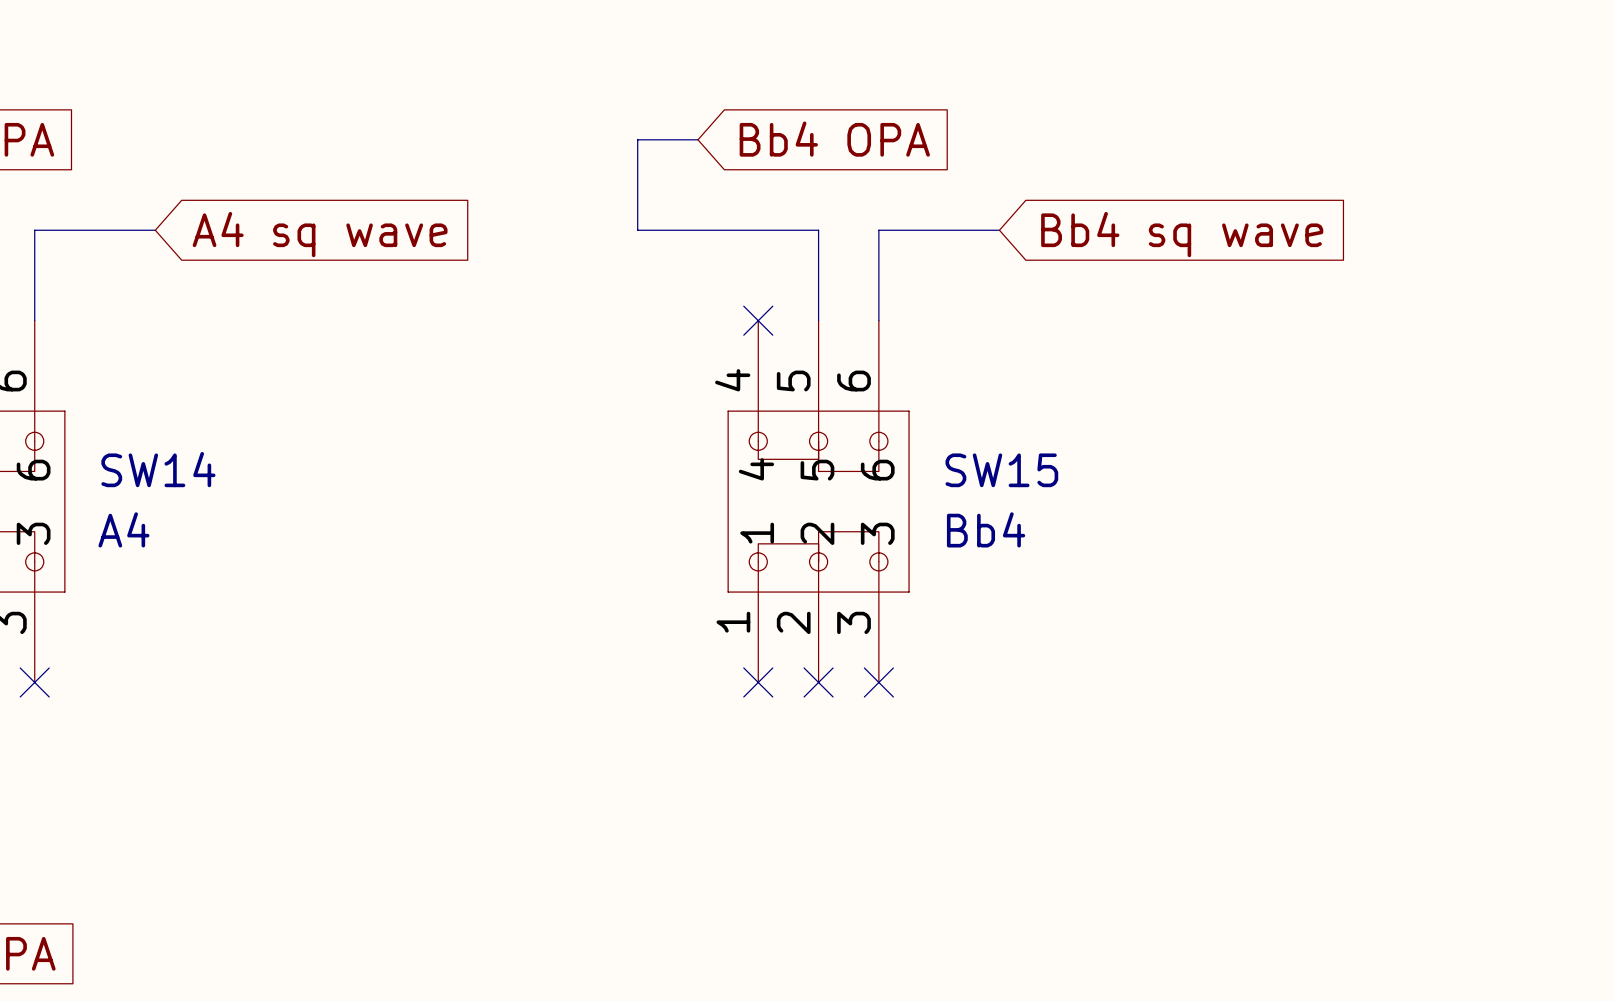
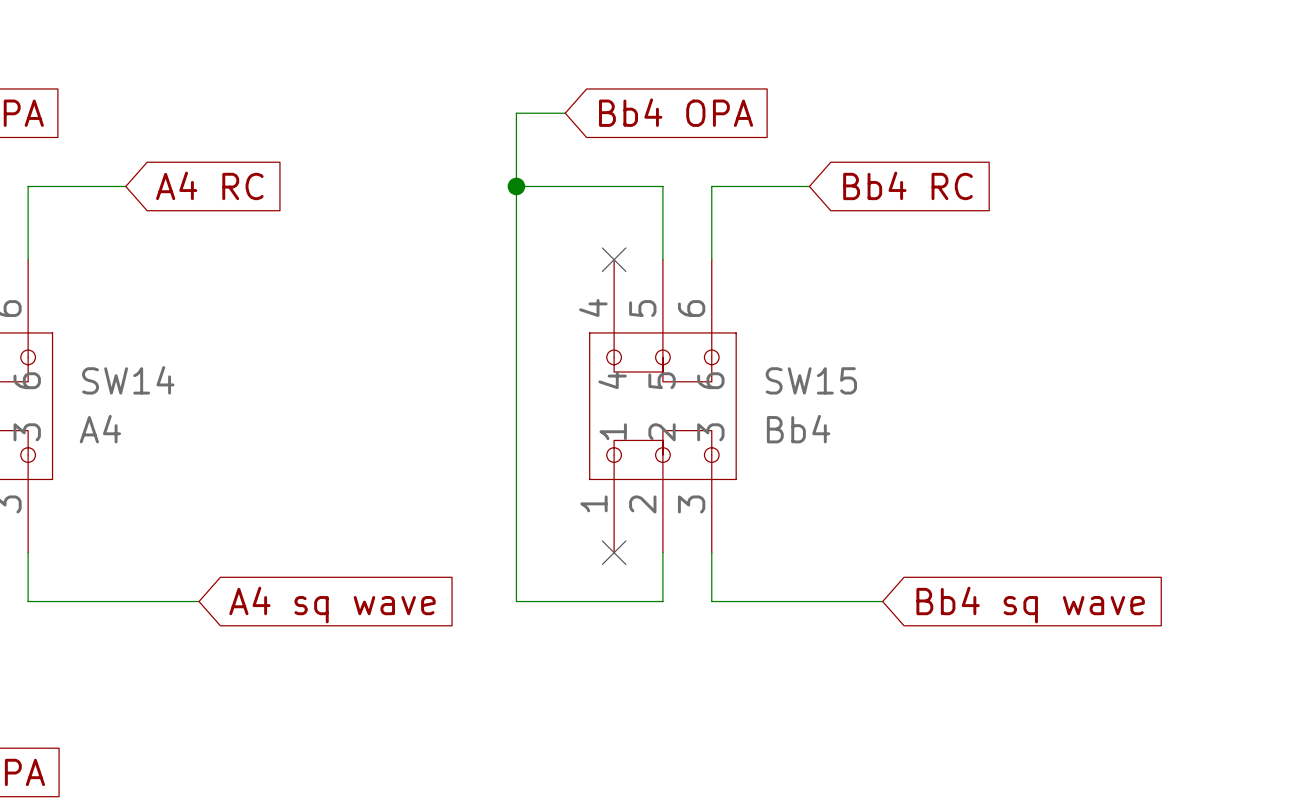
wire: none -> (516, 186) (516, 601) (662, 601) (662, 552)
junction: none -> (516, 186)
global label: A4 sq wave (320, 234) -> A4 RC (209, 185)
global label: Bb4 sq wave (1182, 234) -> Bb4 RC (908, 185)
wire: none -> (28, 552) (28, 601) (199, 601)
no-connect mark: (34, 682) -> none
no-connect mark: (818, 682) -> none
wire: none -> (711, 552) (711, 601) (882, 601)
no-connect mark: (878, 682) -> none
global label: none -> A4 sq wave (332, 605)
global label: none -> Bb4 sq wave (1030, 605)

